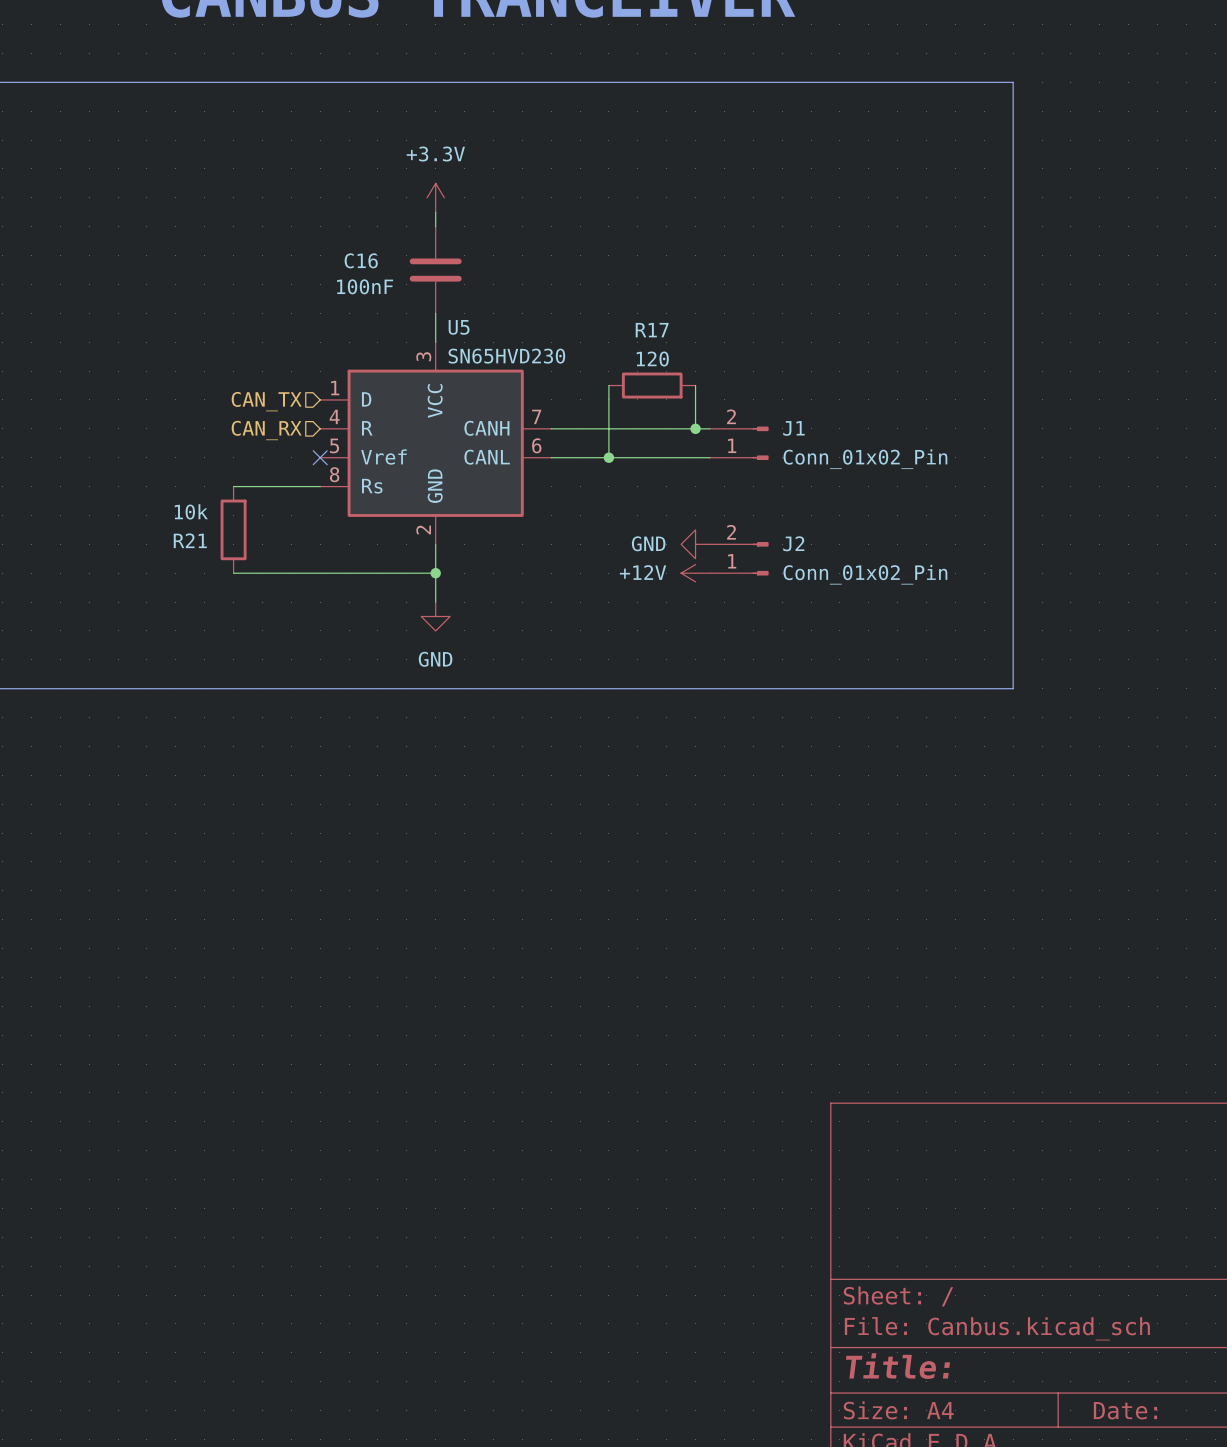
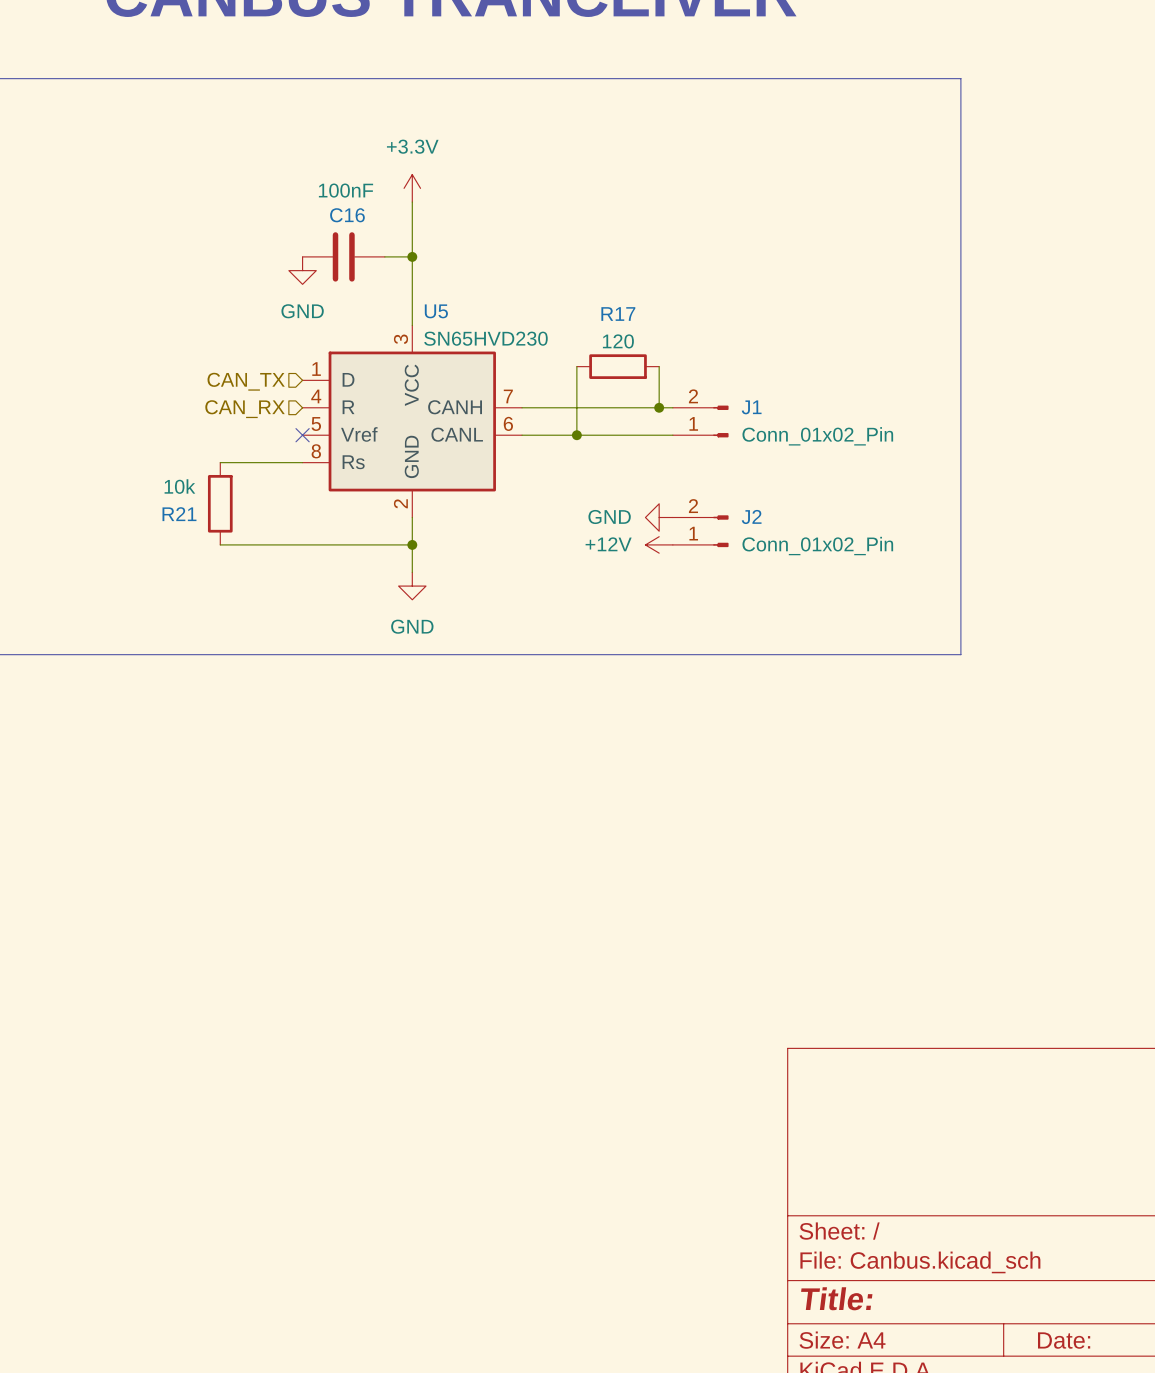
C16 name position: C16 (361, 260) -> C16 (347, 215)
wire: none -> (384, 256) (412, 256)
C16 rotation: 0° (435, 270) -> 90° clockwise (343, 256)
C16 position: (435, 270) -> (343, 256)
junction: none -> (412, 256)
power symbol: none -> GND (302, 270)

